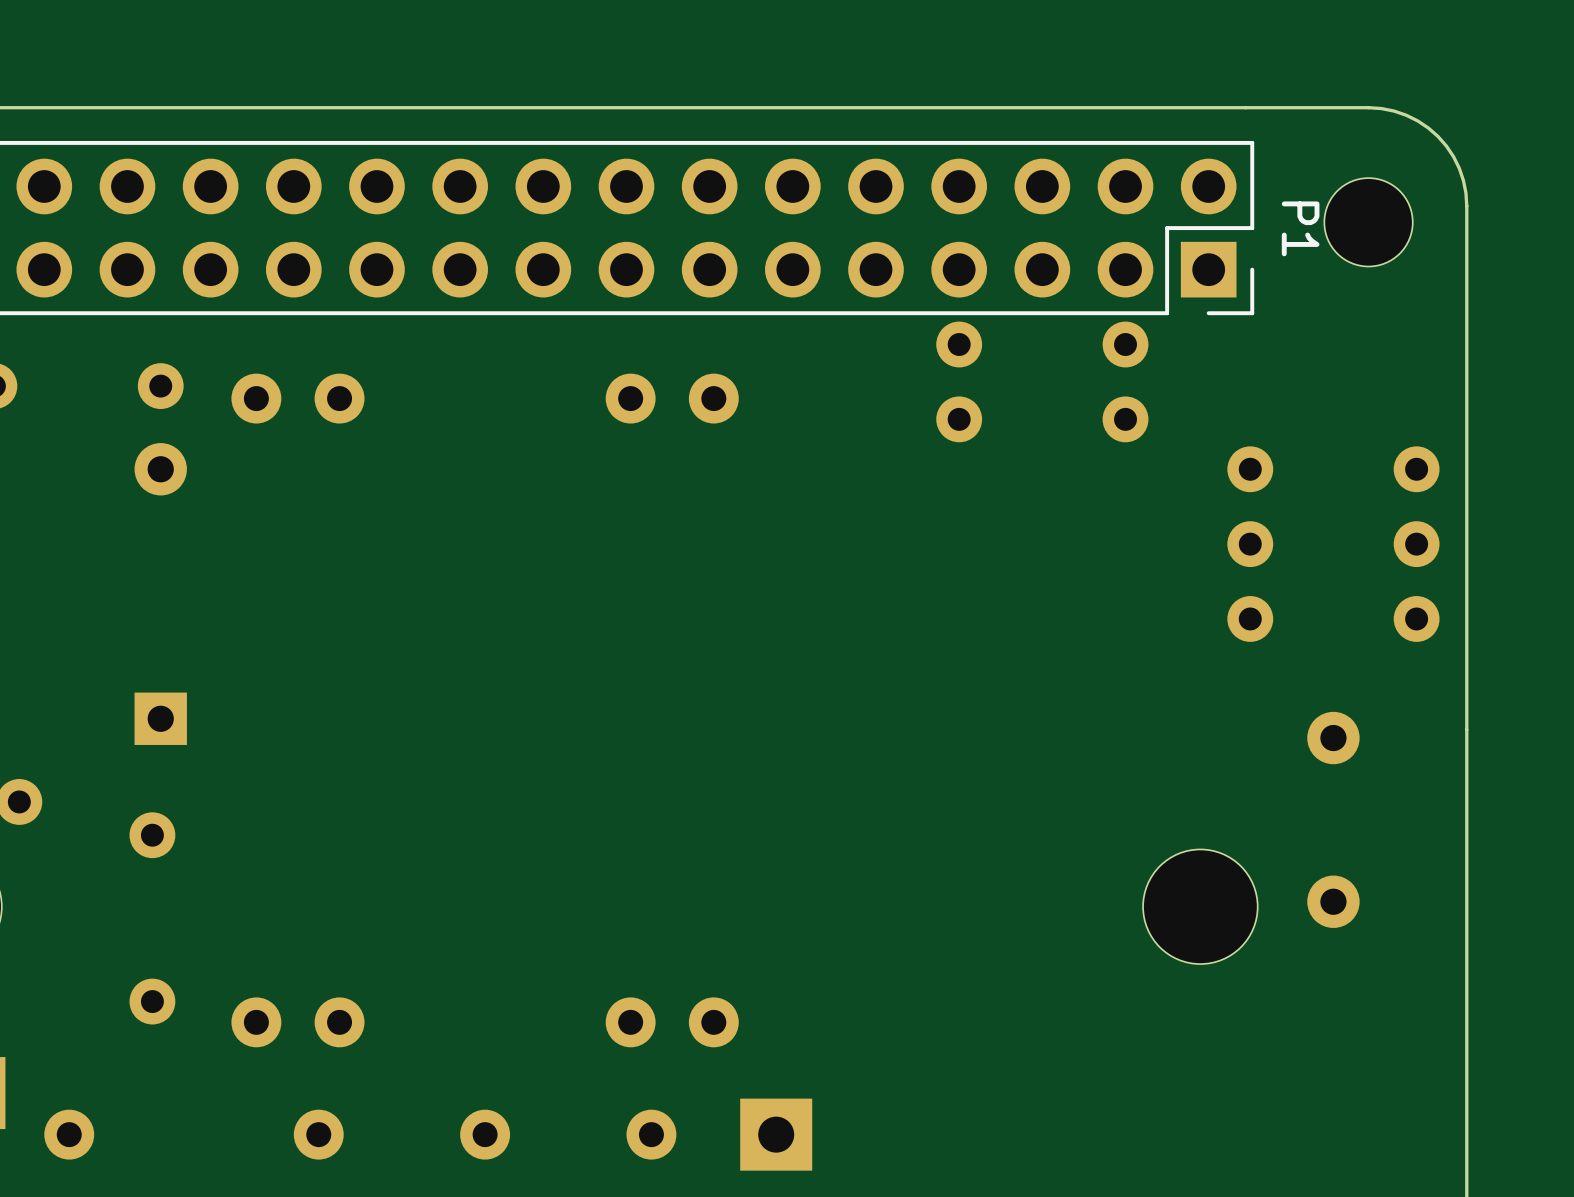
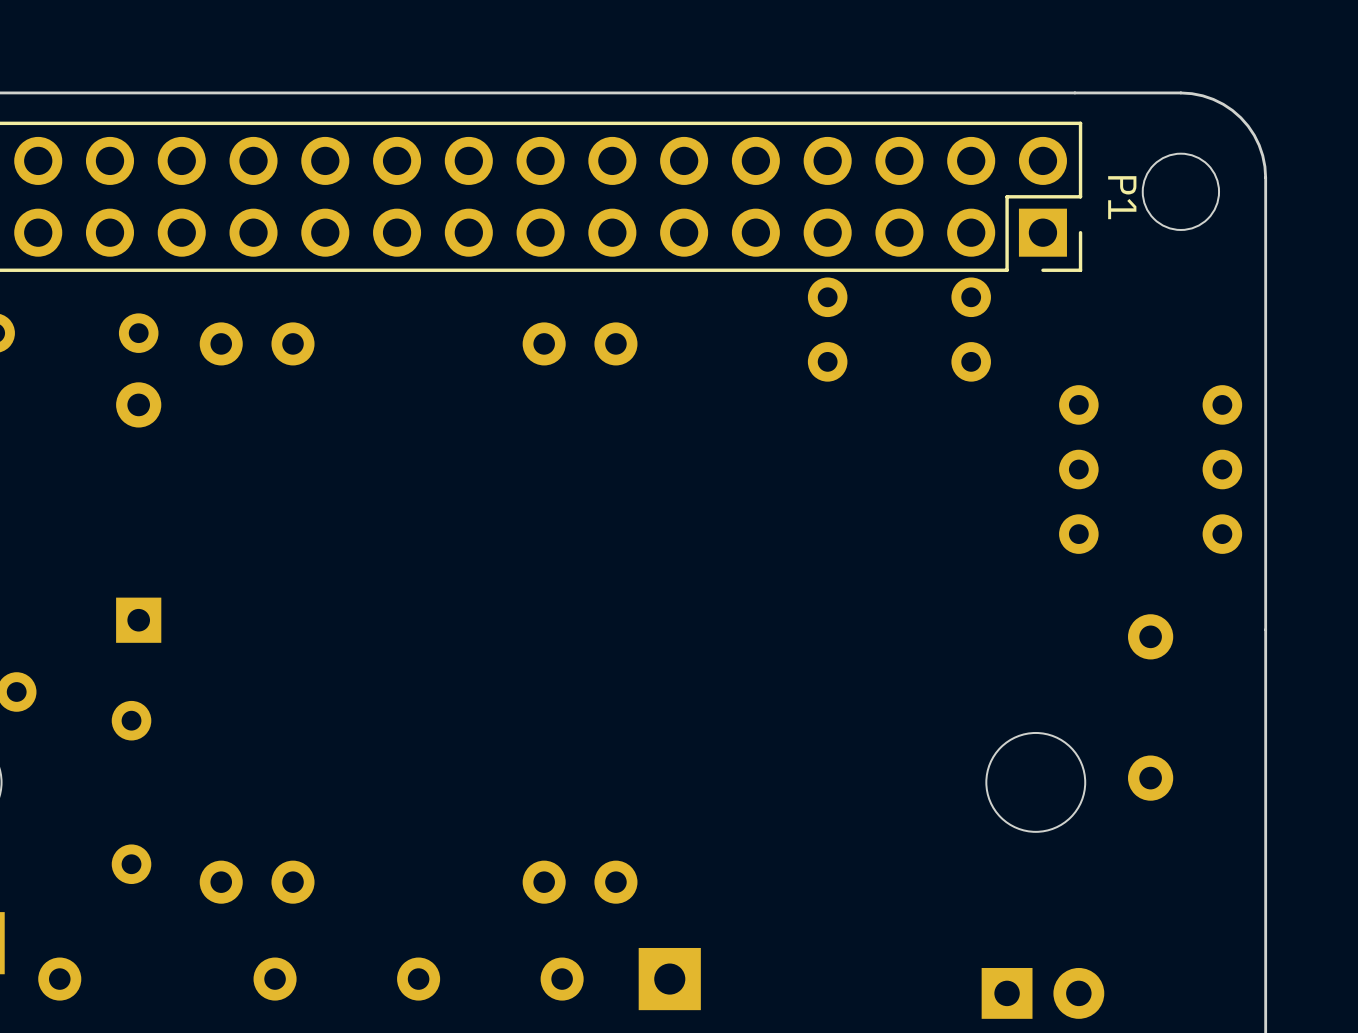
part: none -> (1042, 993)

